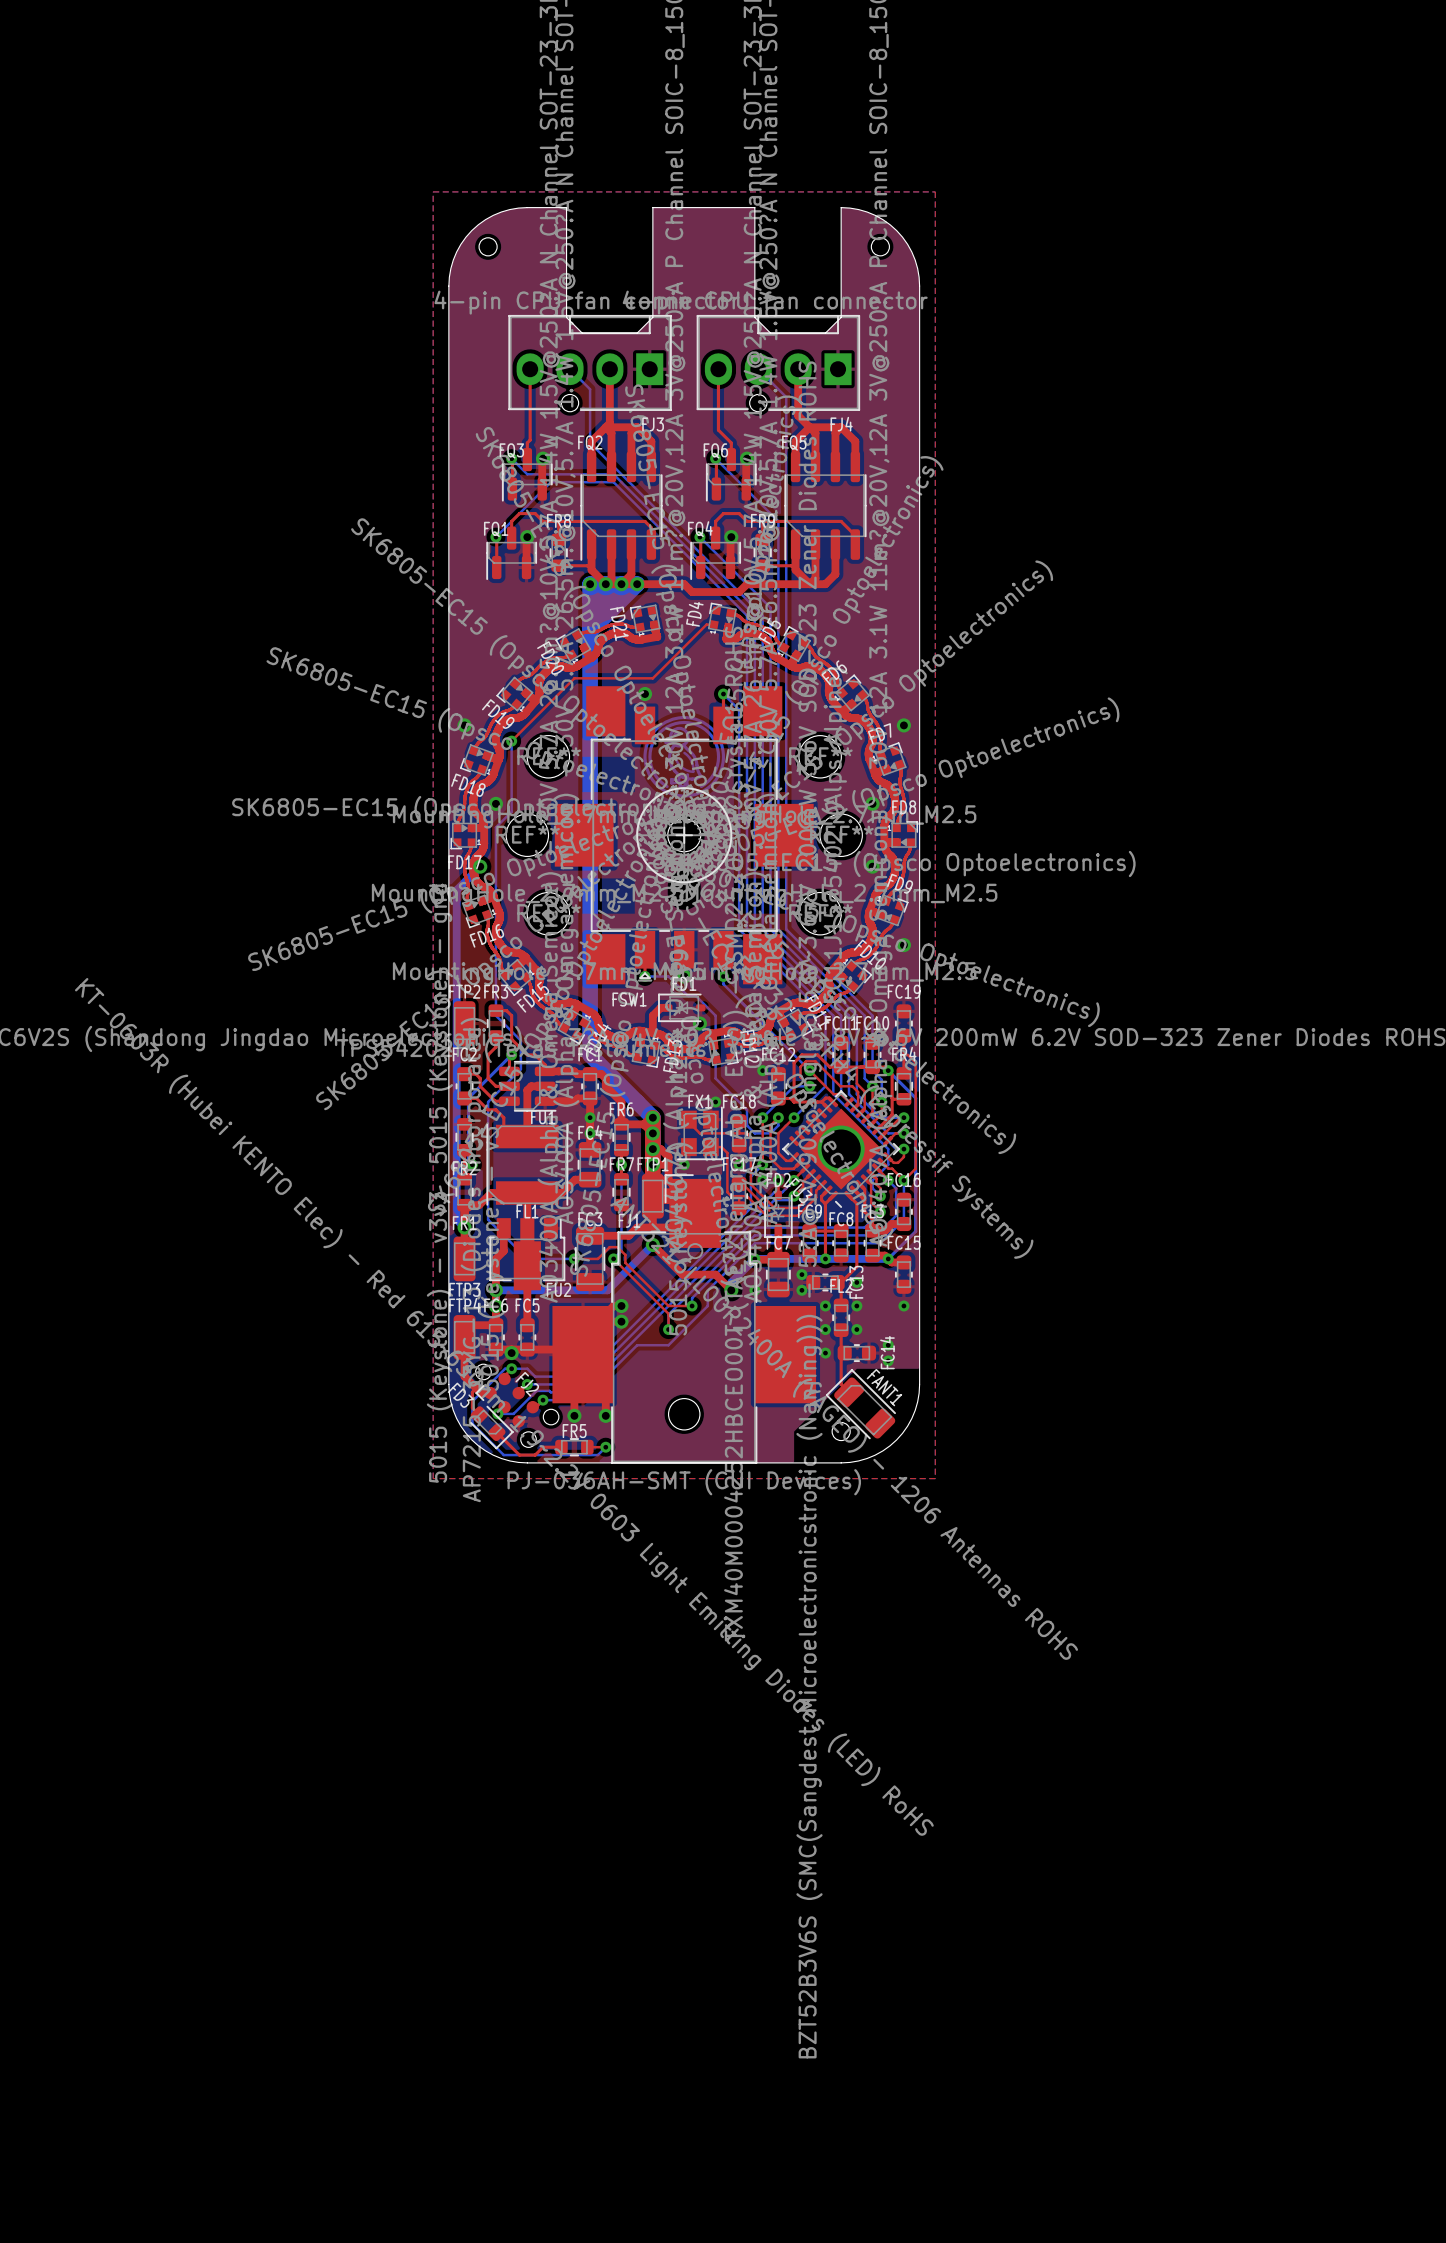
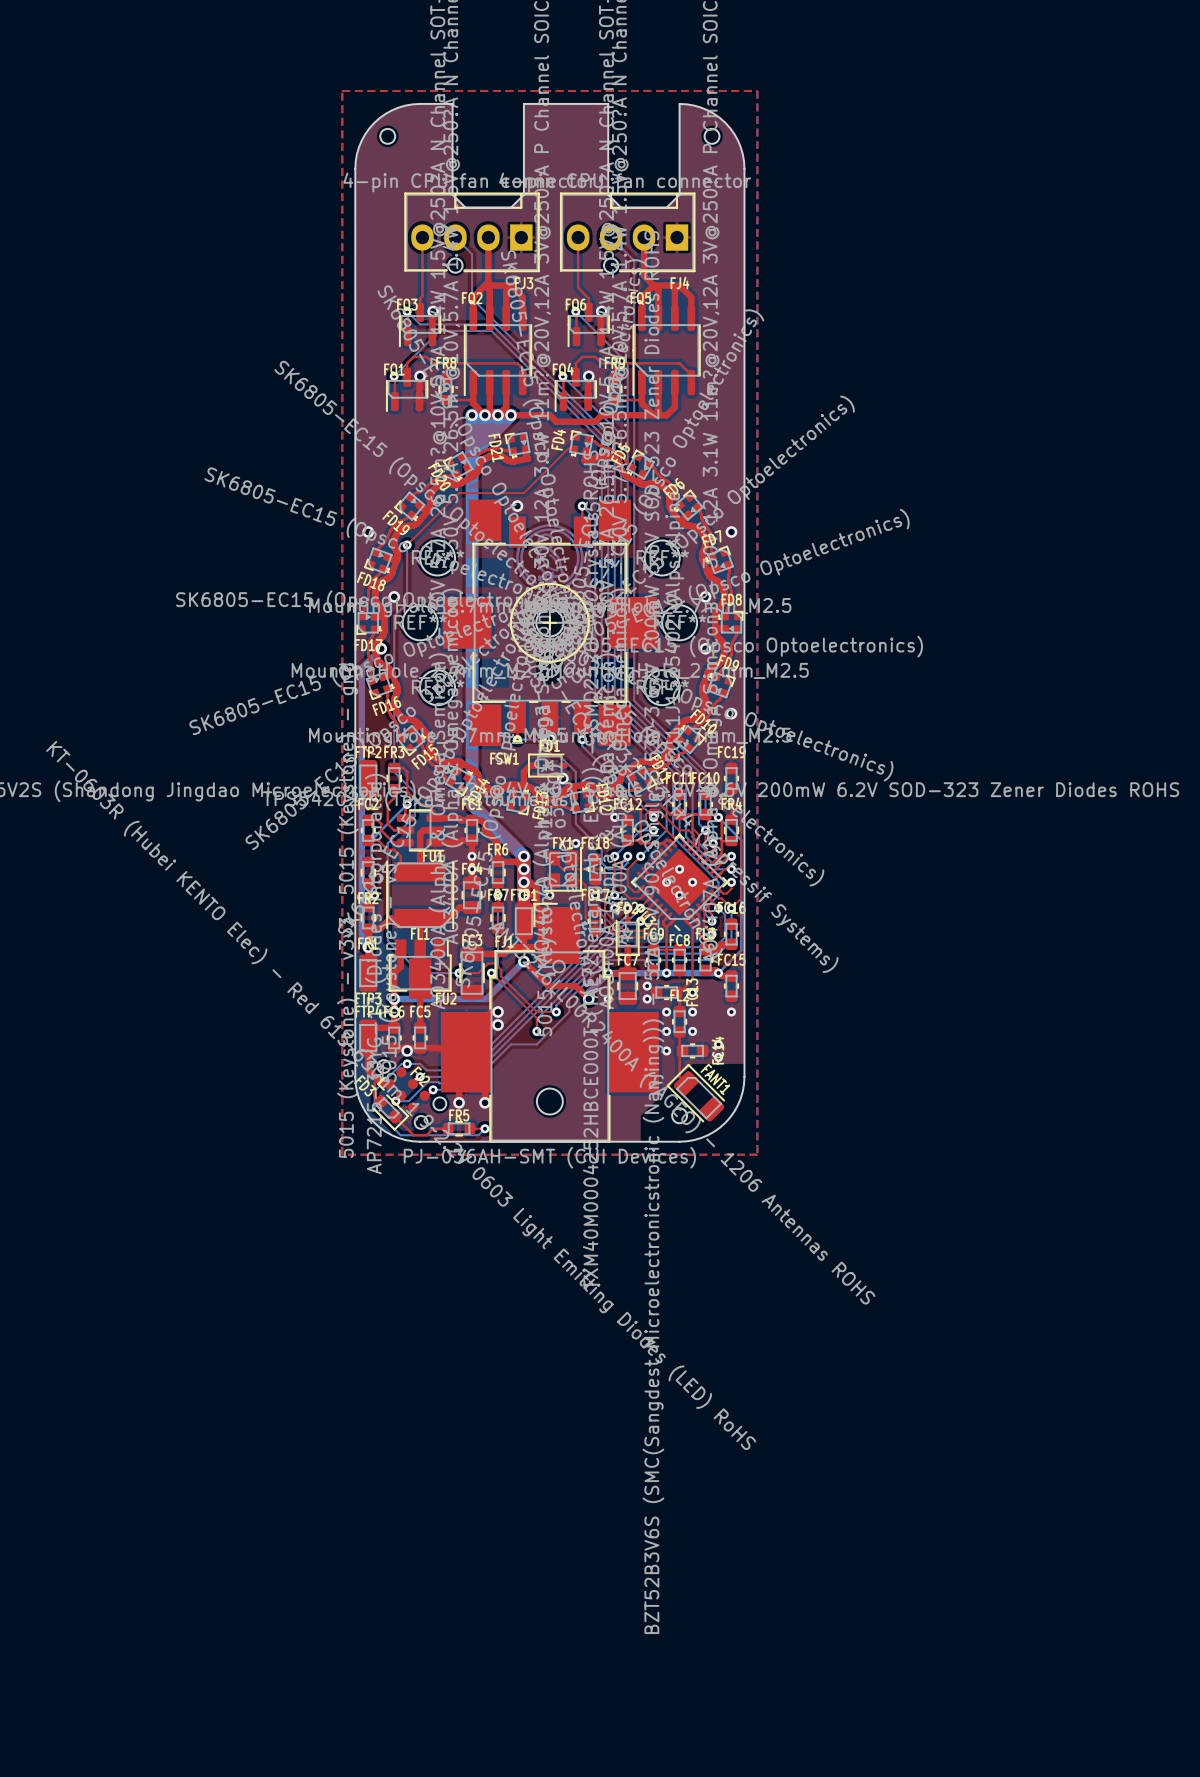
via: none -> (679, 869)
via: none -> (666, 882)
via: (841, 1149) -> none
via: none -> (692, 882)
via: none -> (679, 895)

